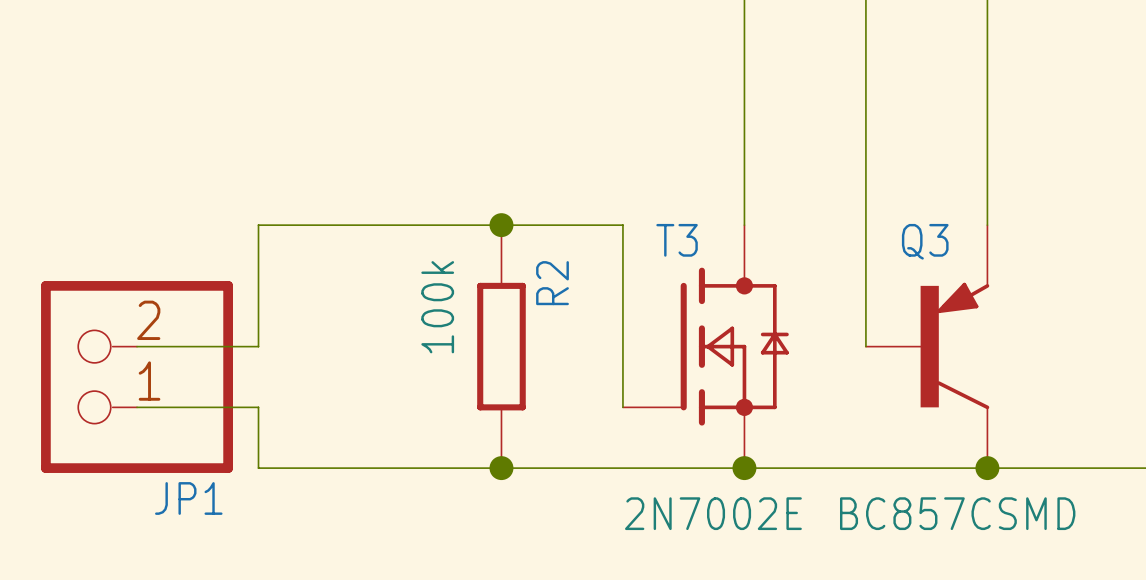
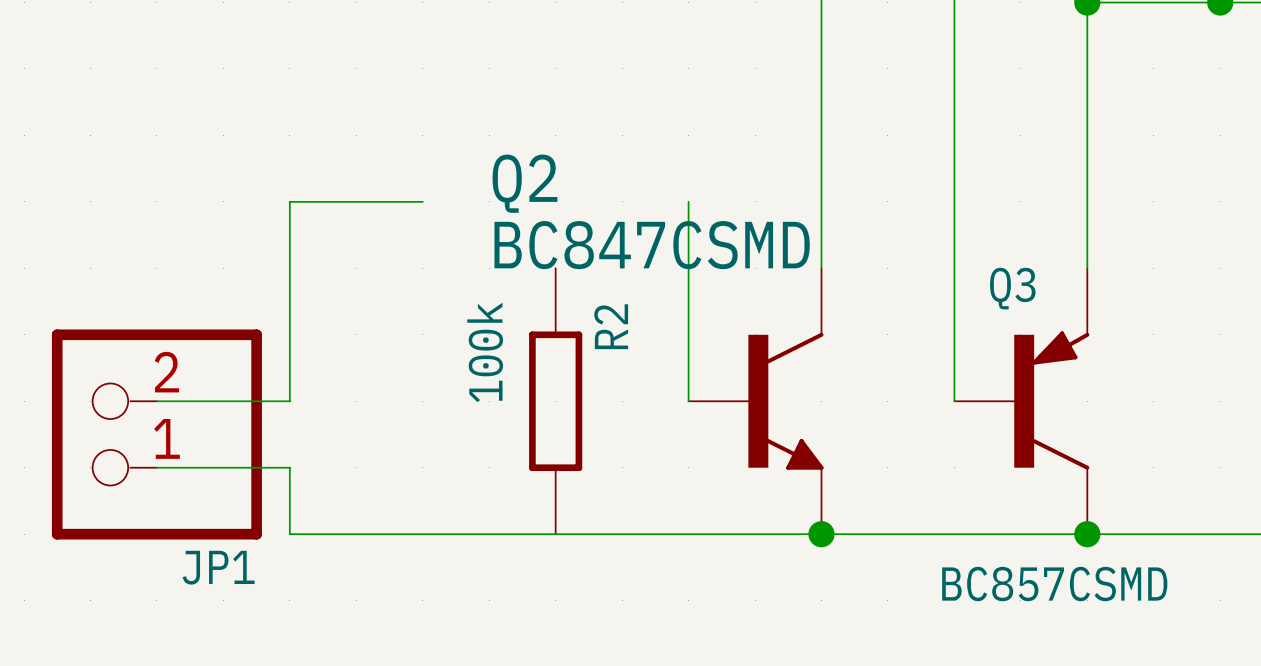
wire: (258, 225) (622, 225) -> (289, 268) (289, 201) (422, 201)
junction: (501, 225) -> none
wire: (622, 346) (622, 407) -> (688, 201) (688, 268)
Q2: none -> BC847CSMD (756, 401)
T3: 2N7002E (705, 346) -> none
junction: (501, 468) -> none

